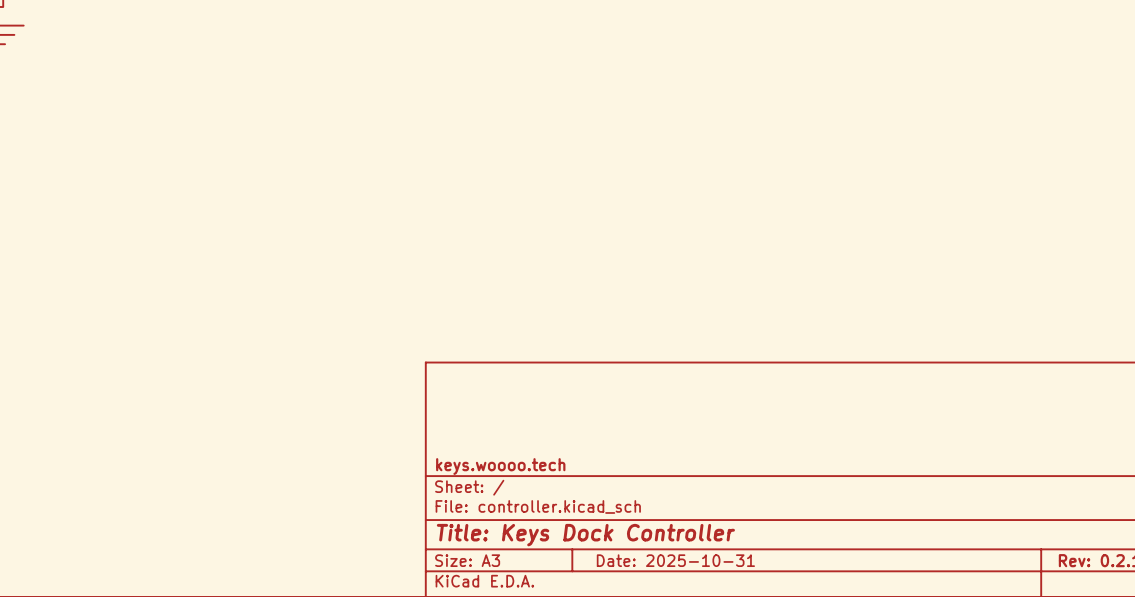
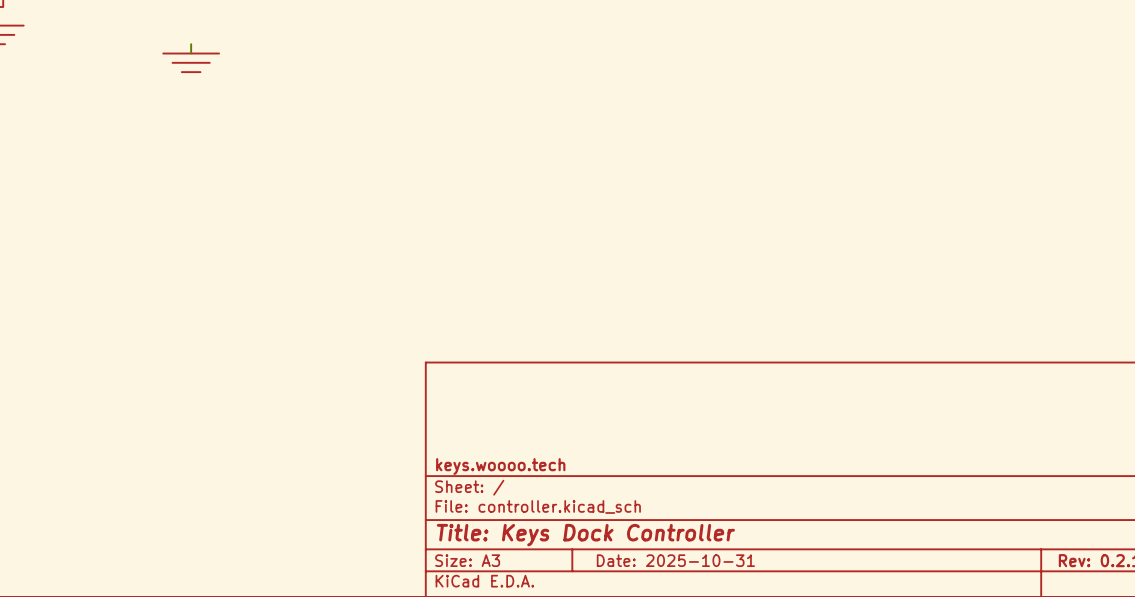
wire: none -> (191, 44) (191, 53)
power symbol: none -> (191, 62)

